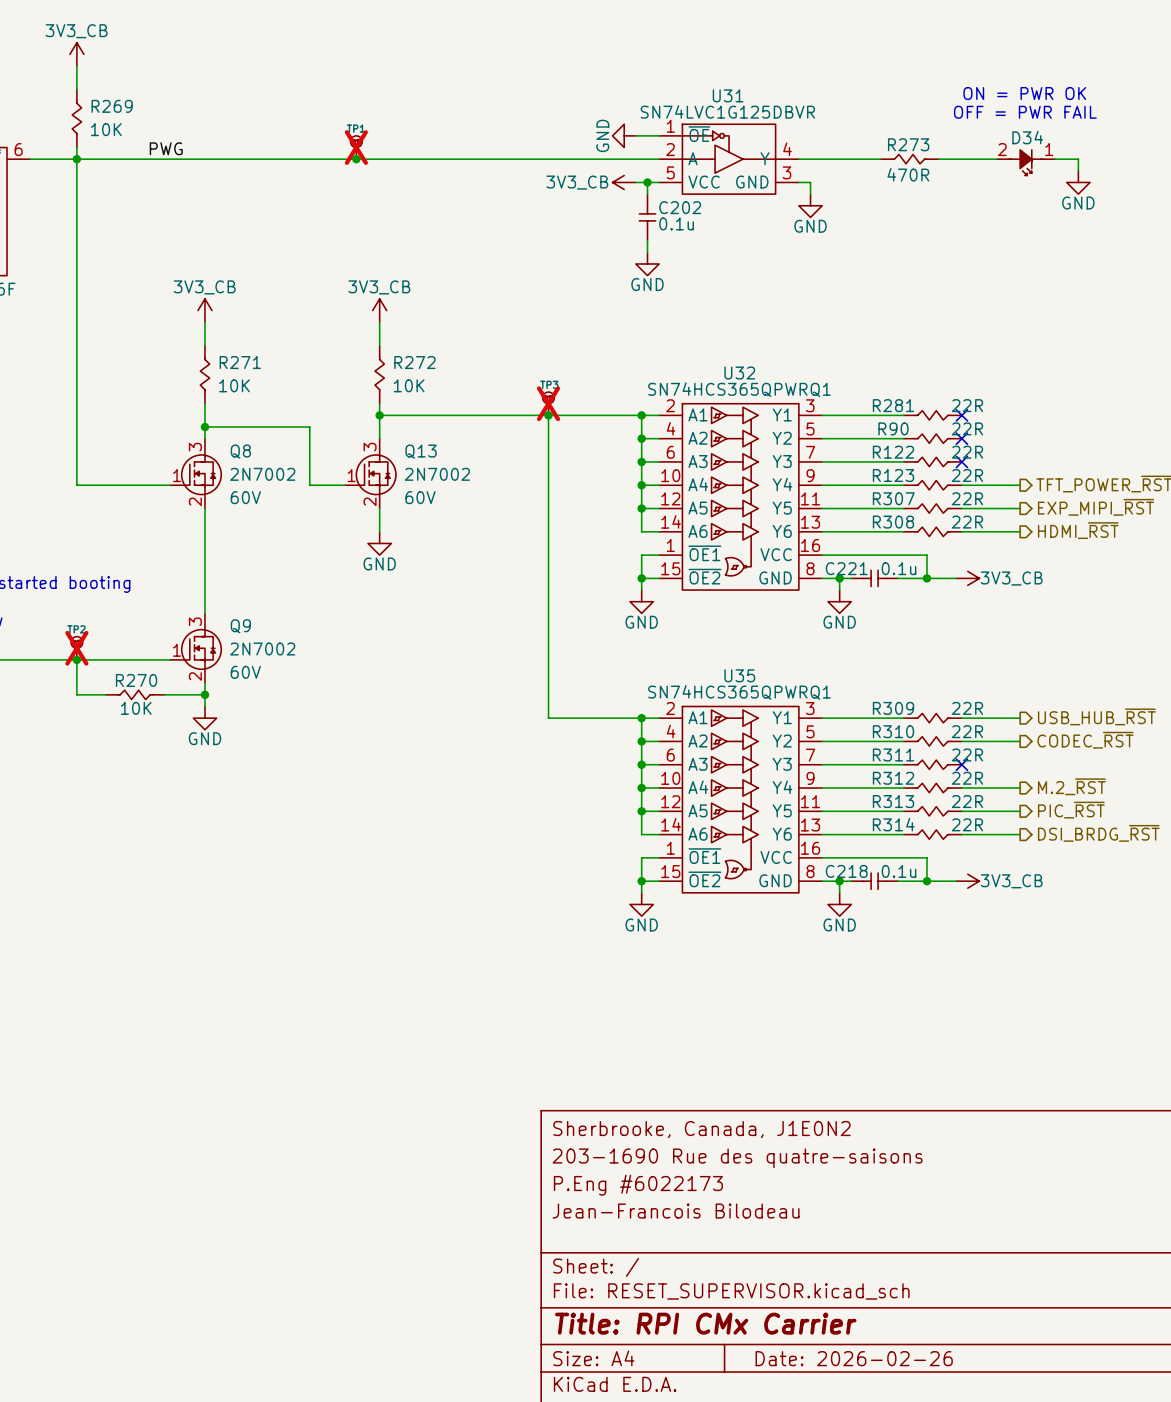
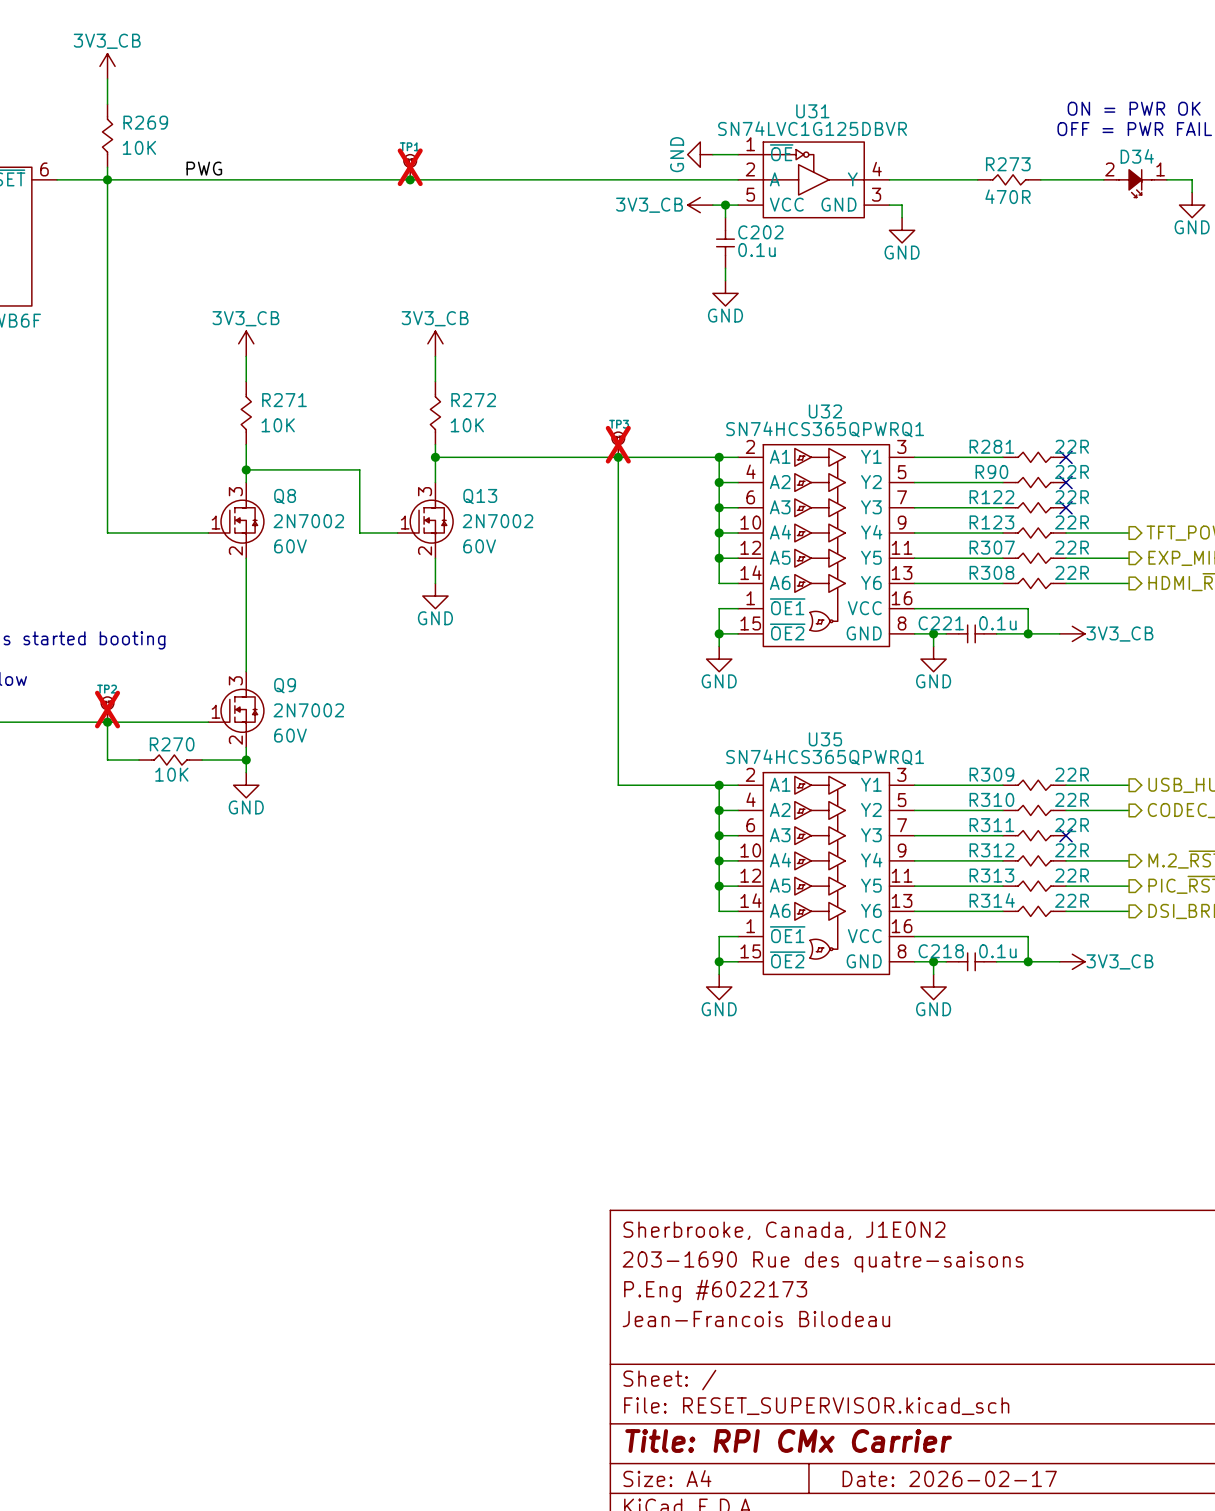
title block: Date: 2026-02-26 (854, 1358) -> Date: 2026-02-17 (949, 1478)

